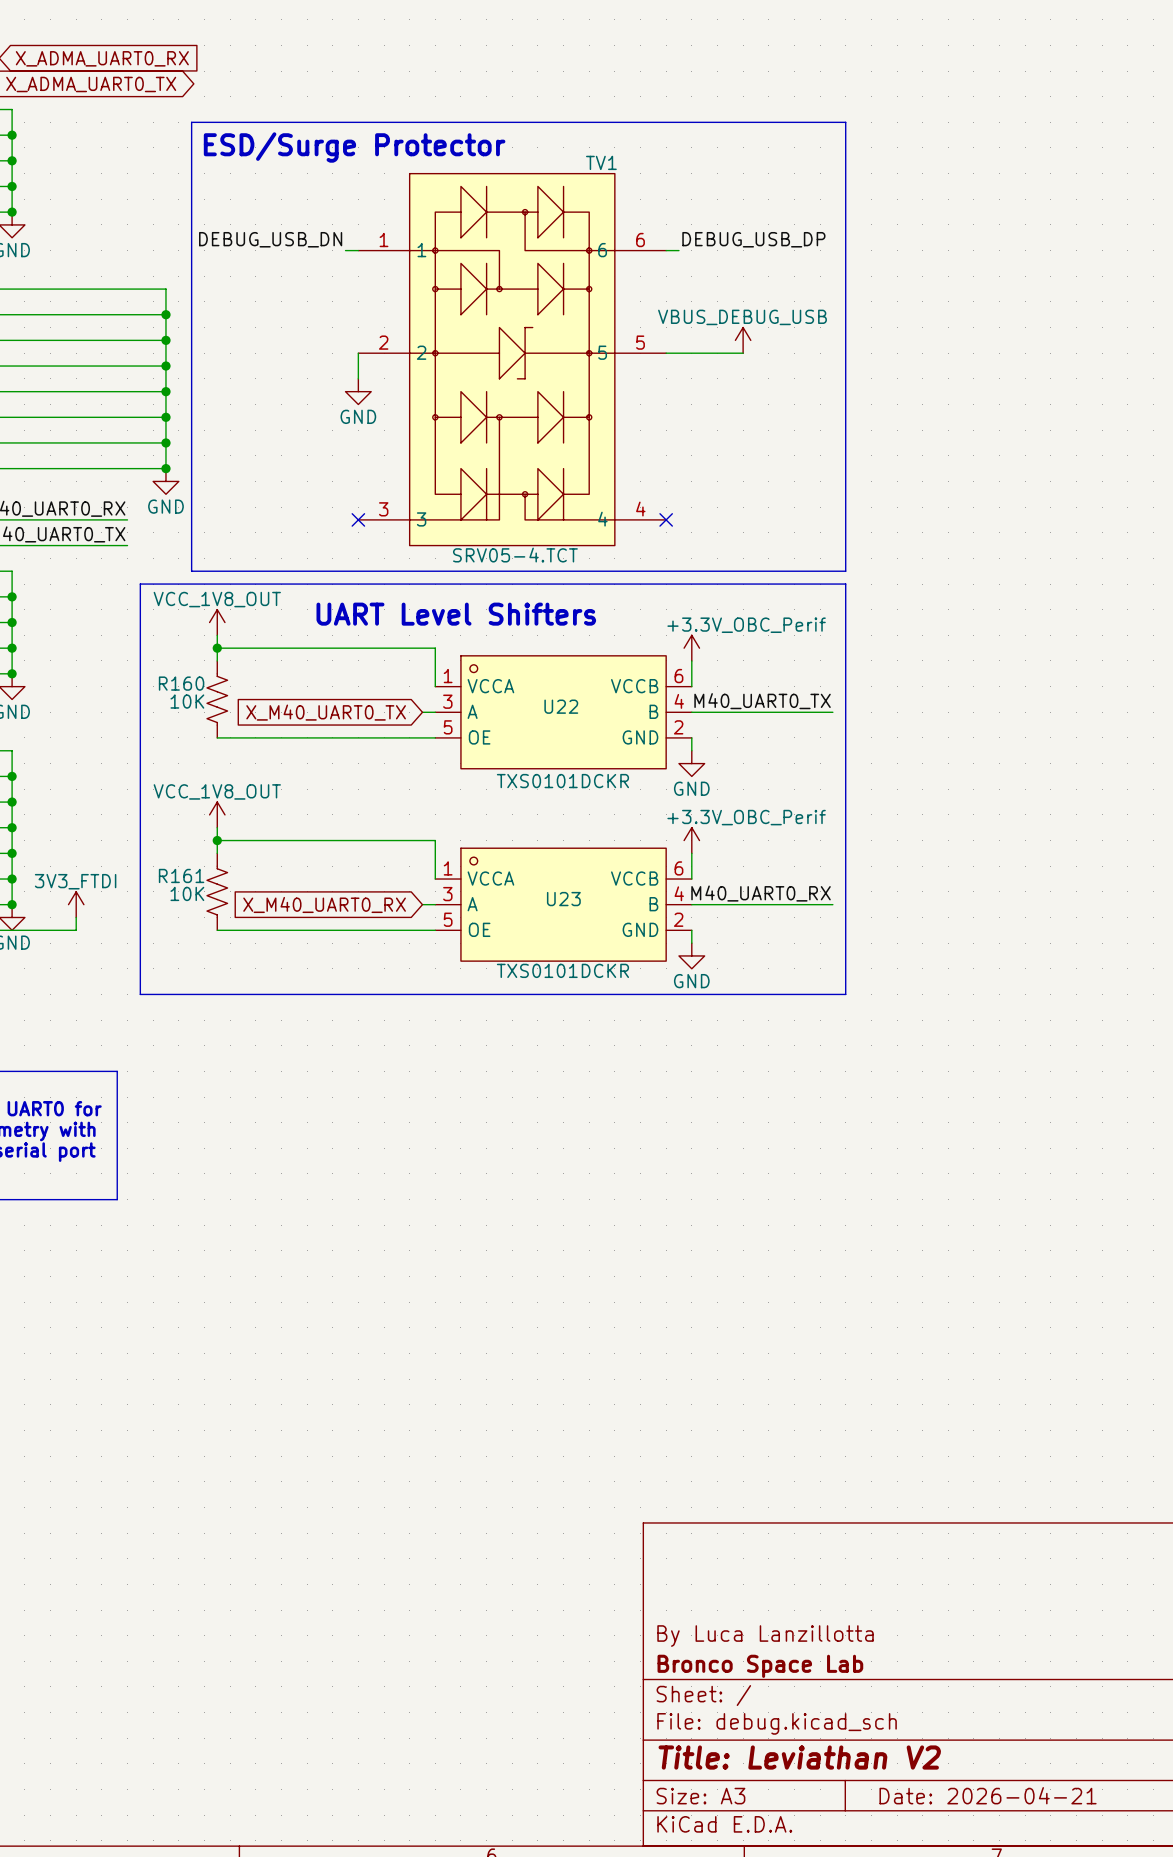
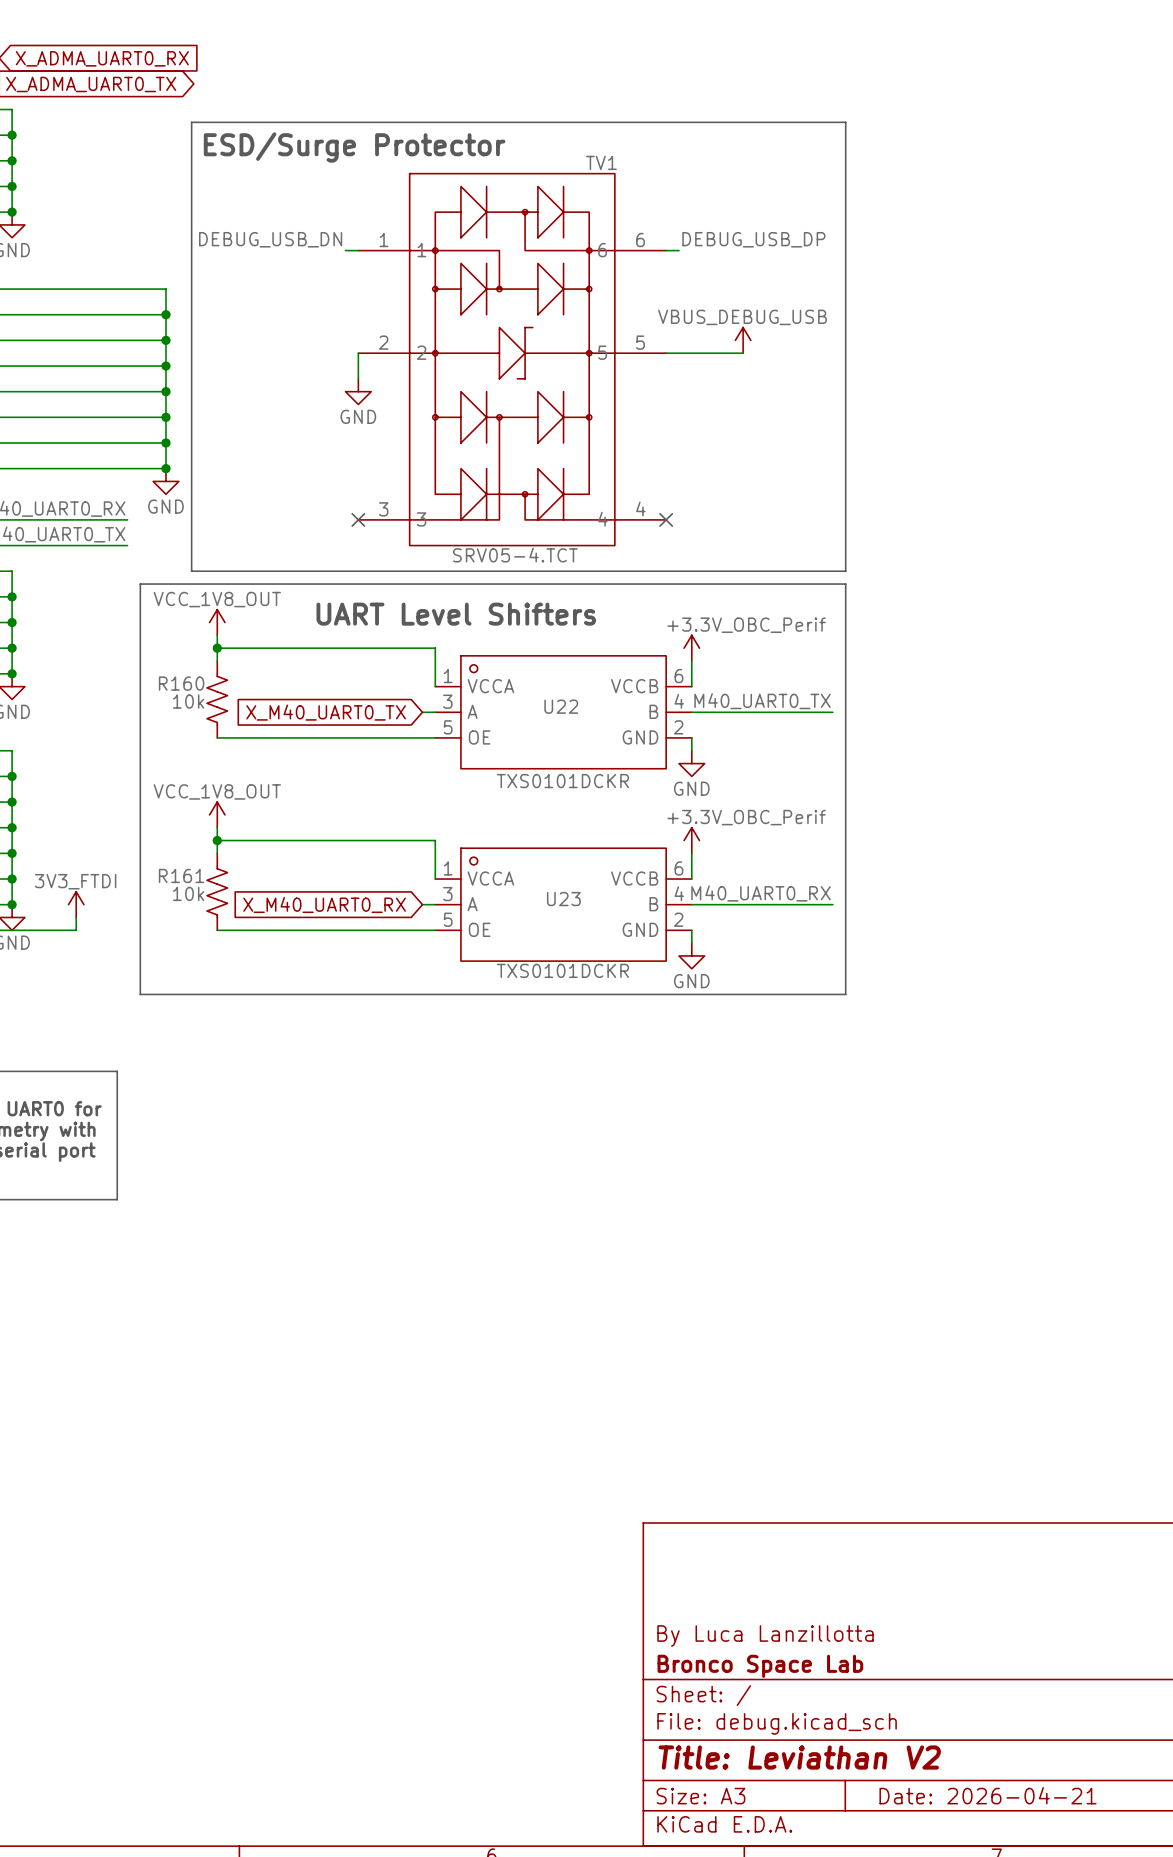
R160 value: 10K (187, 701) -> 10k (188, 701)
R161 value: 10K (187, 893) -> 10k (188, 893)

